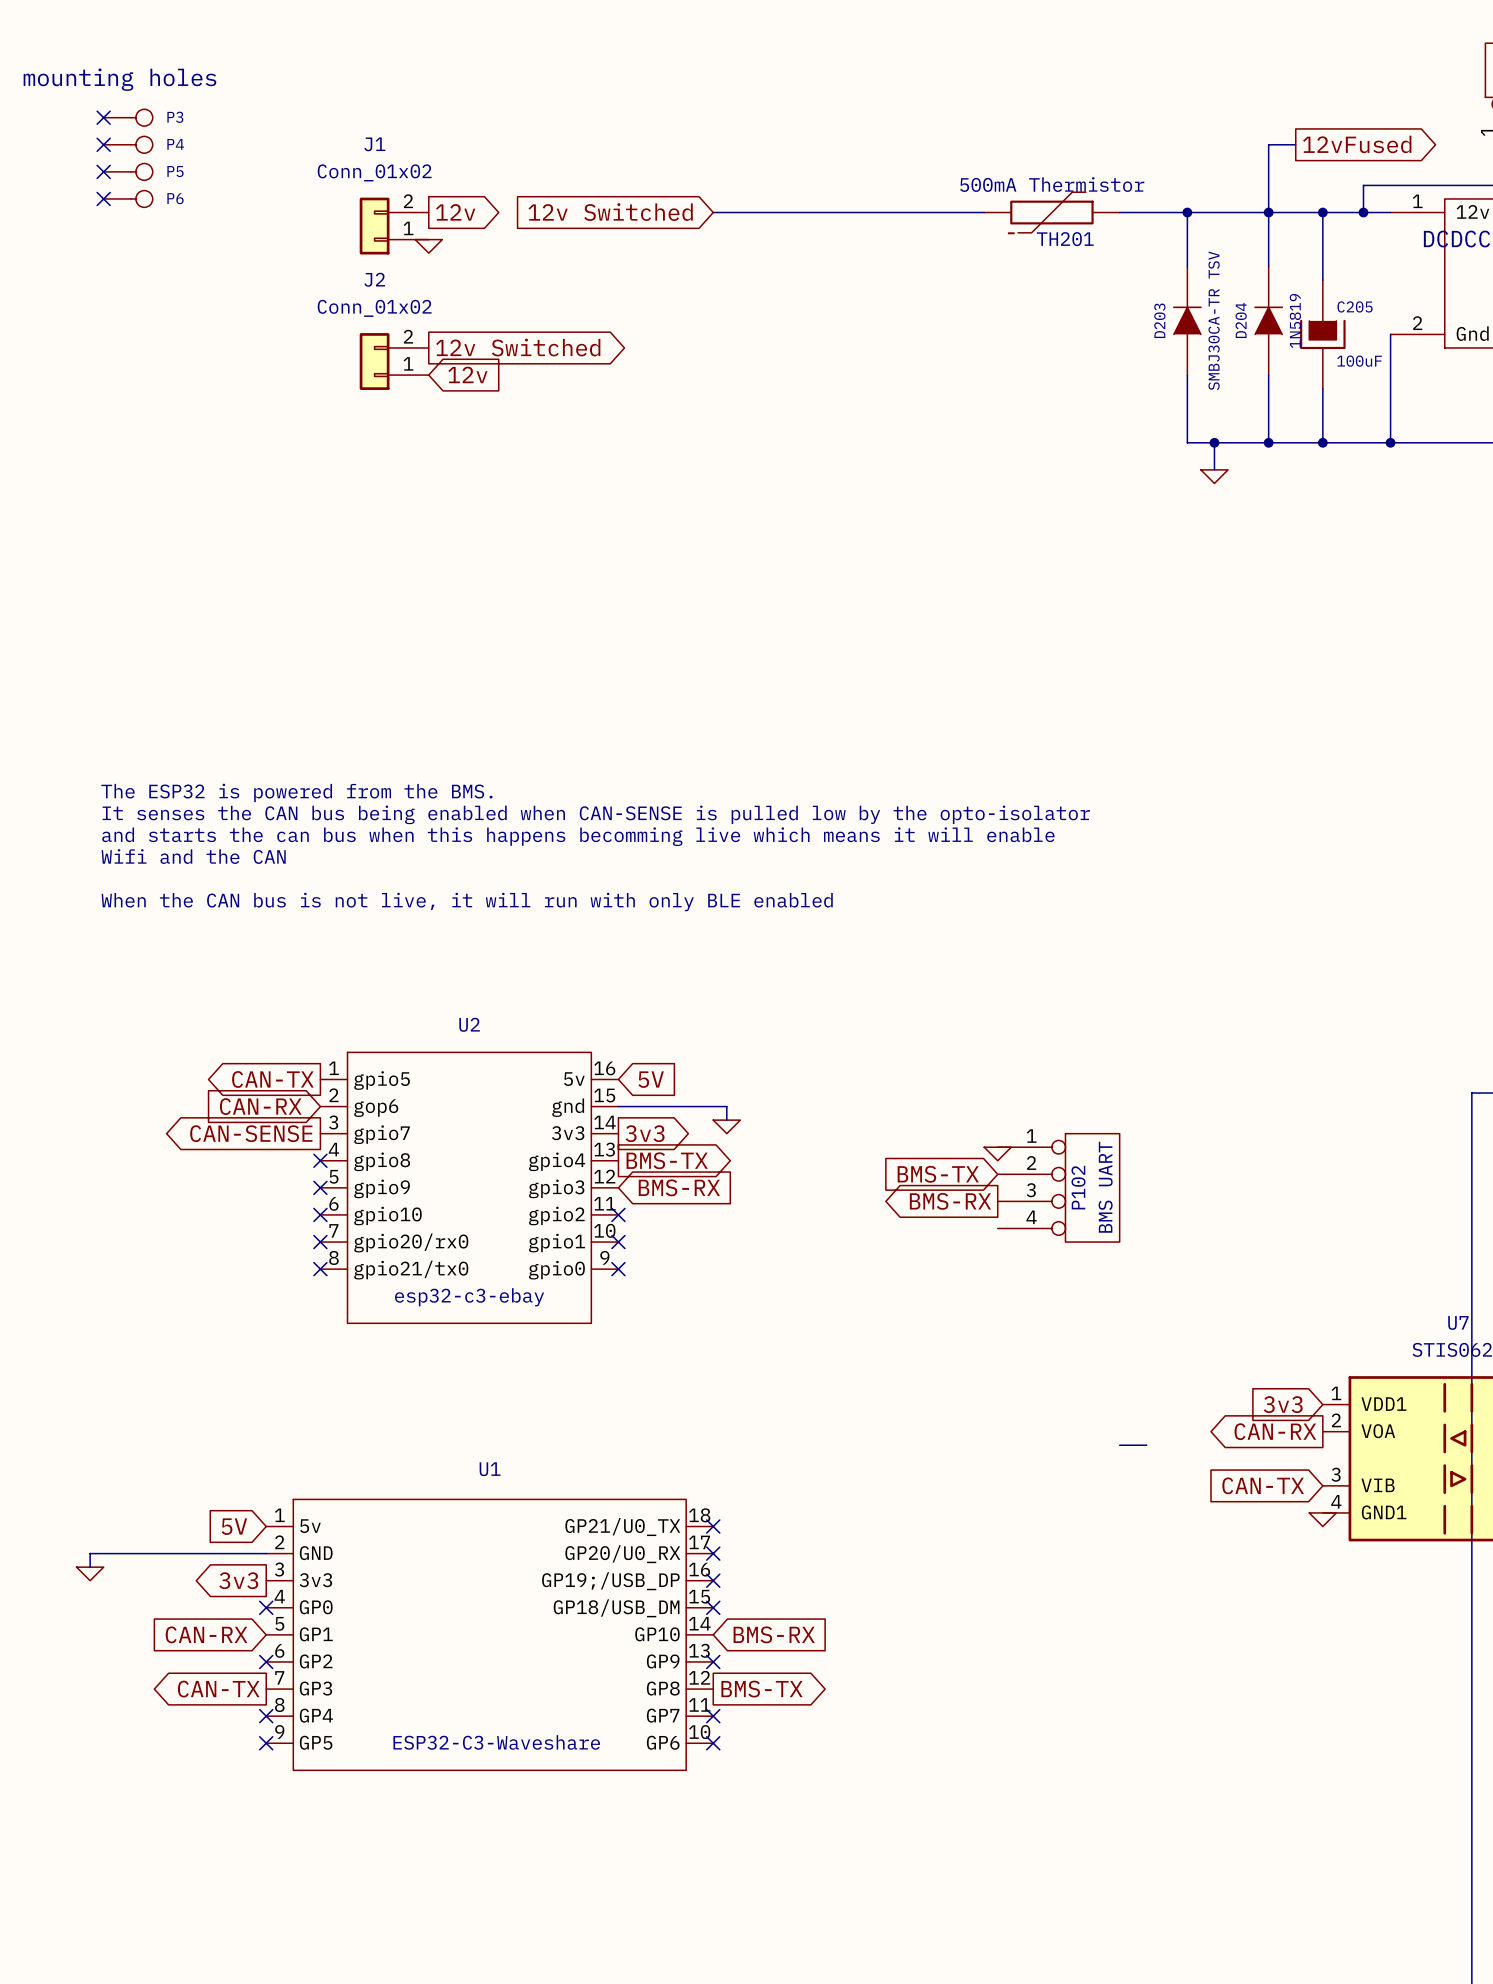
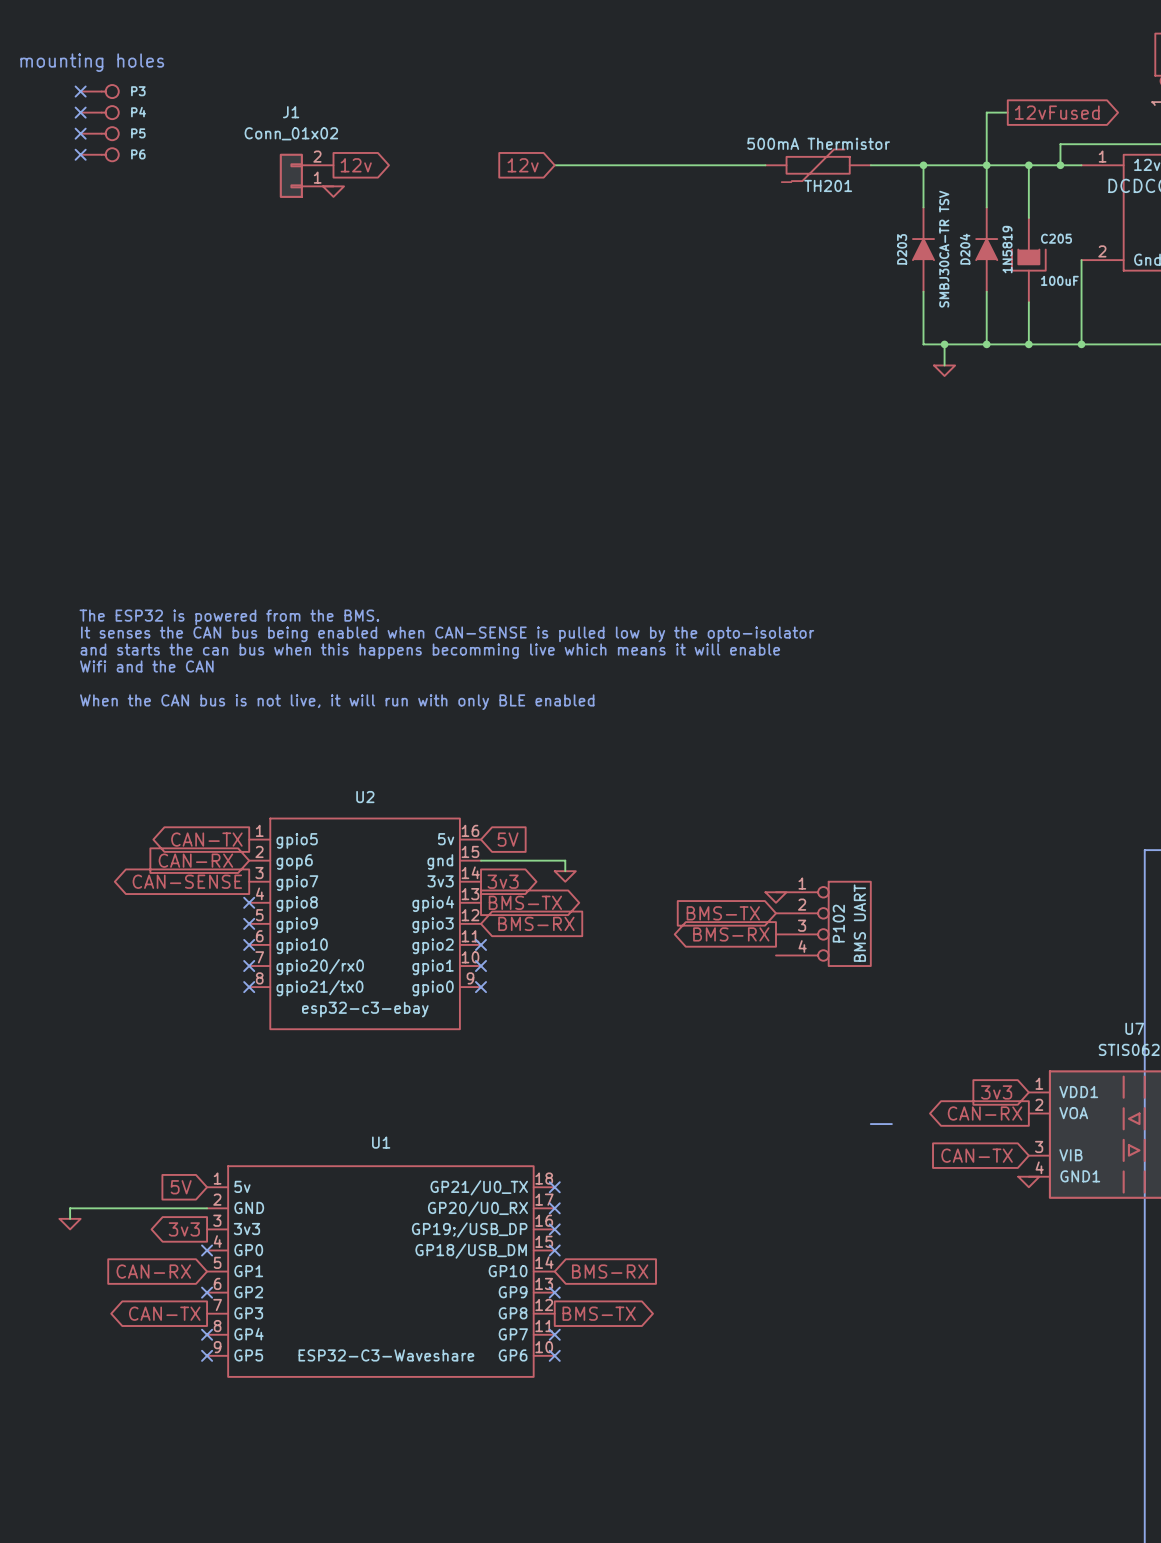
global label: 12v Switched (610, 212) -> 12v (523, 165)
global label: 12v Switched (518, 347) -> none
J2: Conn_01x02 (394, 361) -> none
global label: 12v (467, 374) -> none

